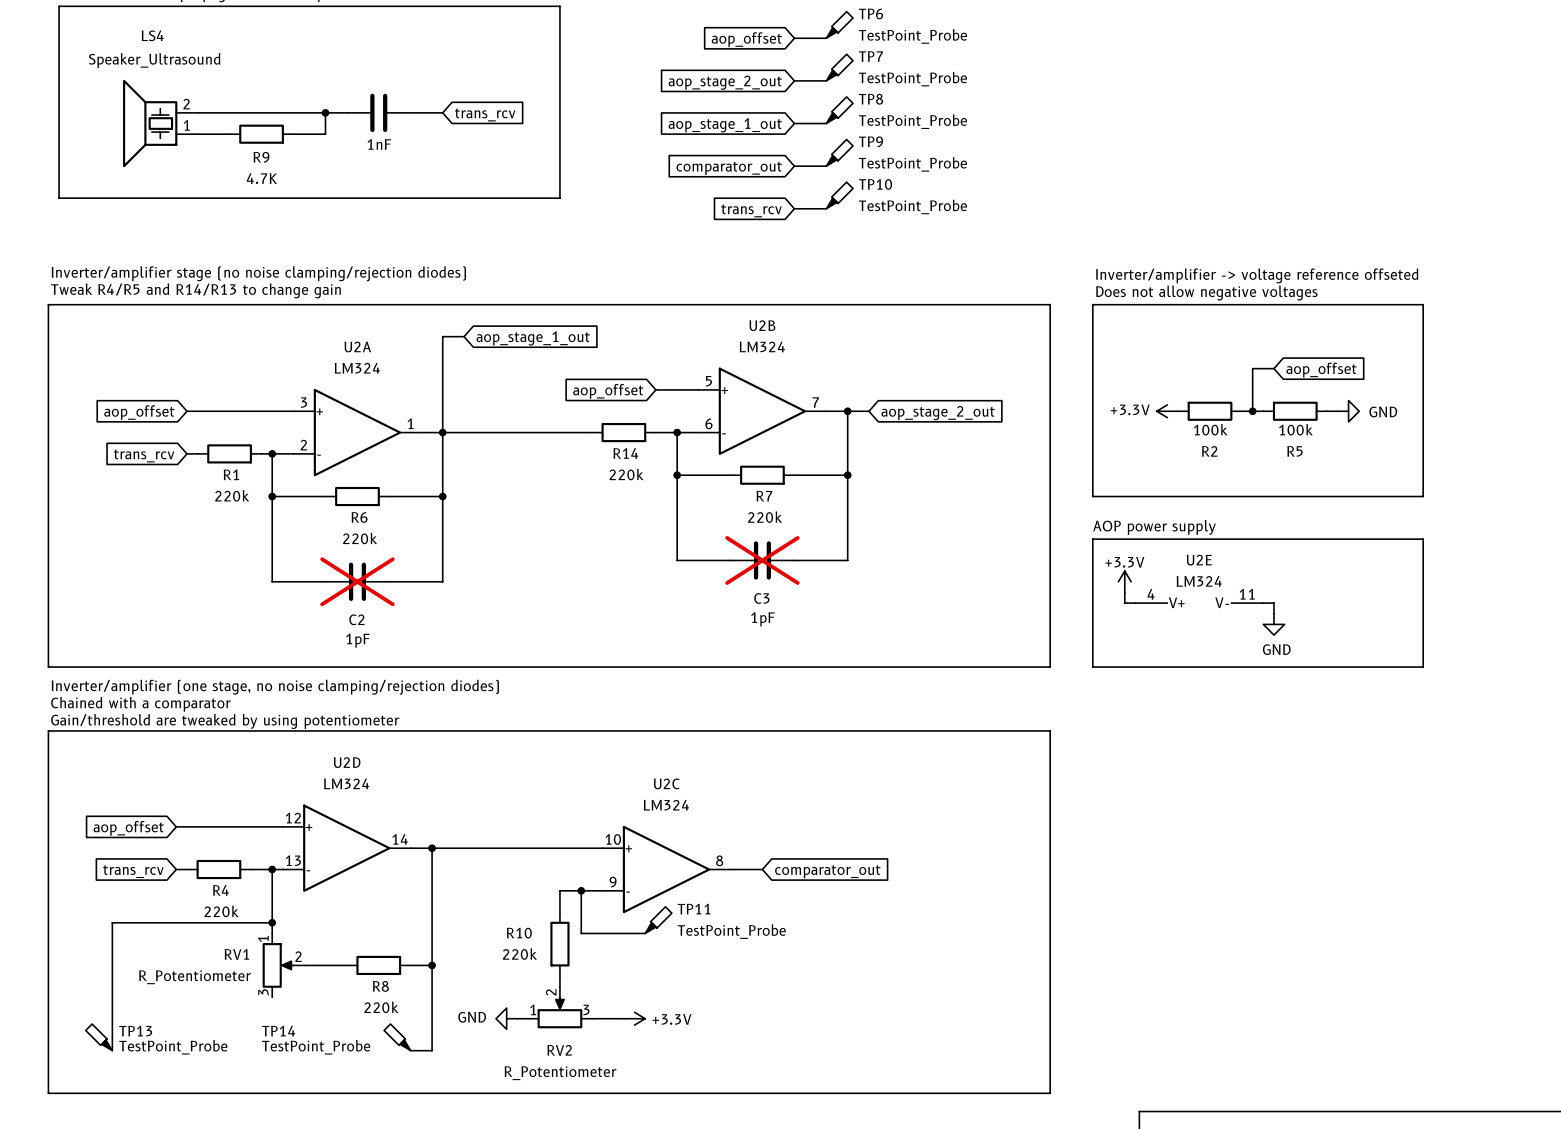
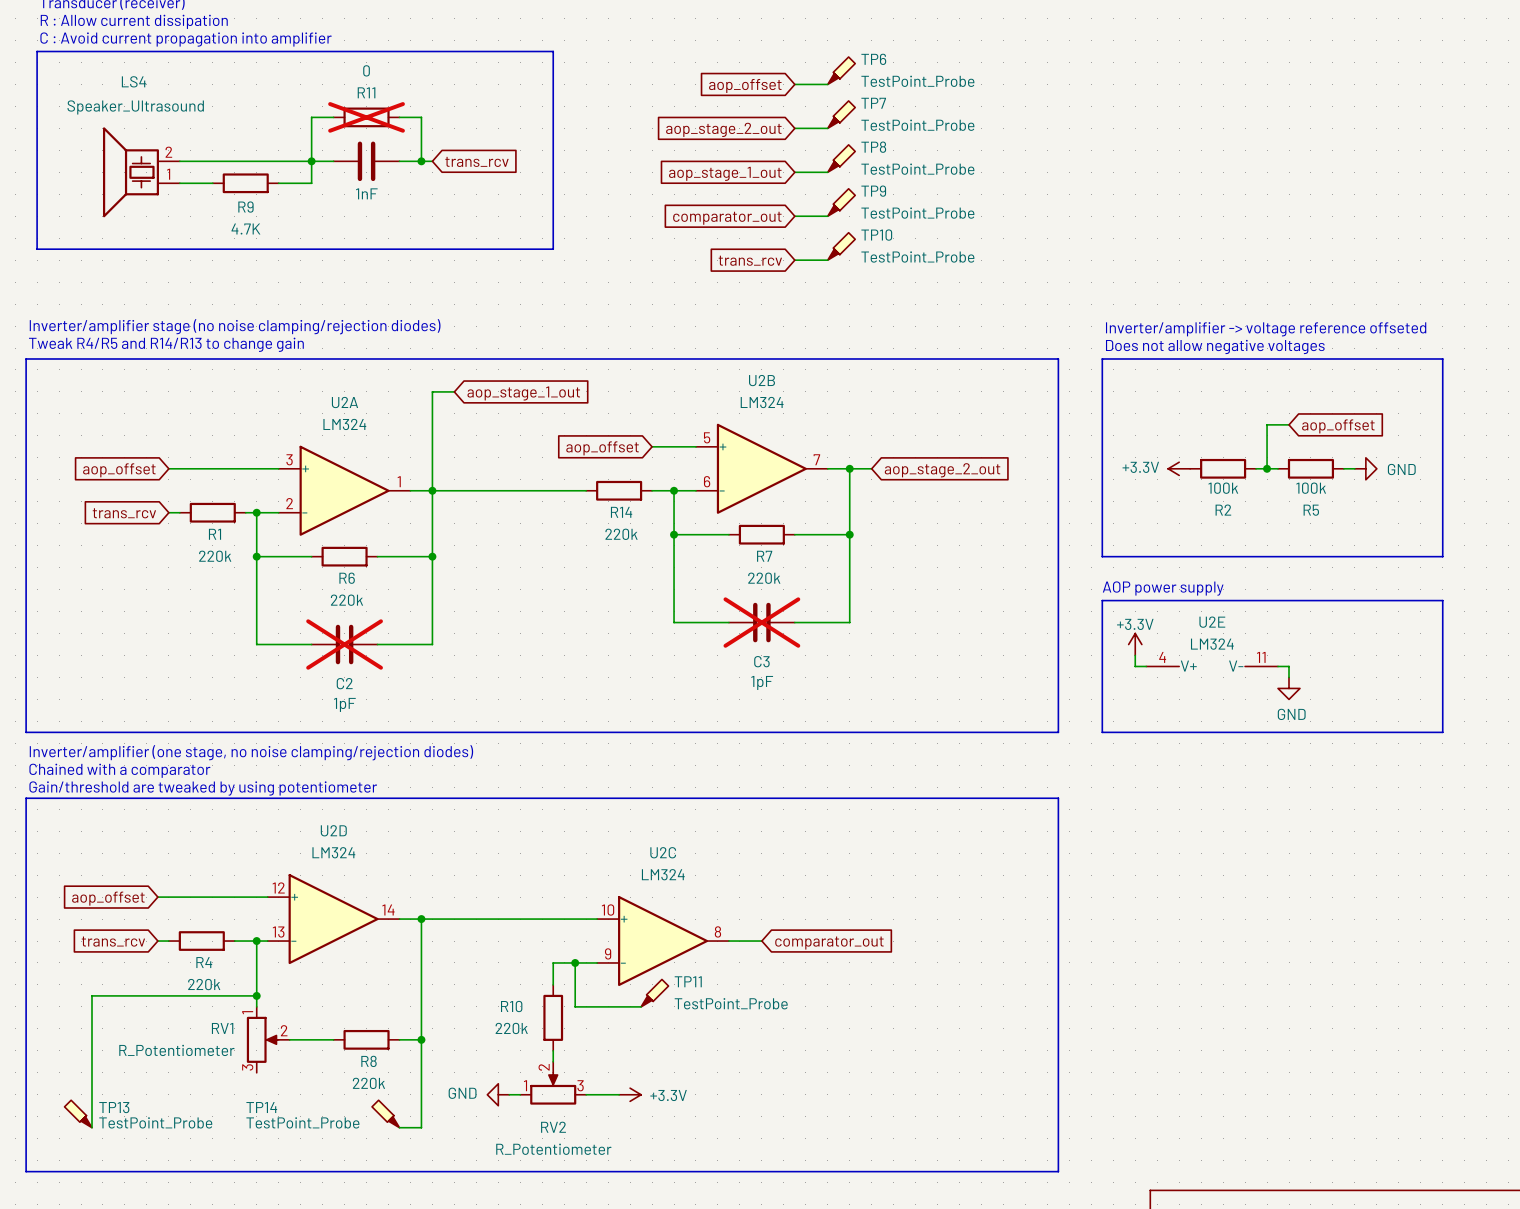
wire: none -> (333, 117) (311, 117) (311, 161)
R11: none -> 0 (366, 117)
wire: none -> (399, 117) (421, 117) (421, 161)
junction: none -> (421, 161)

